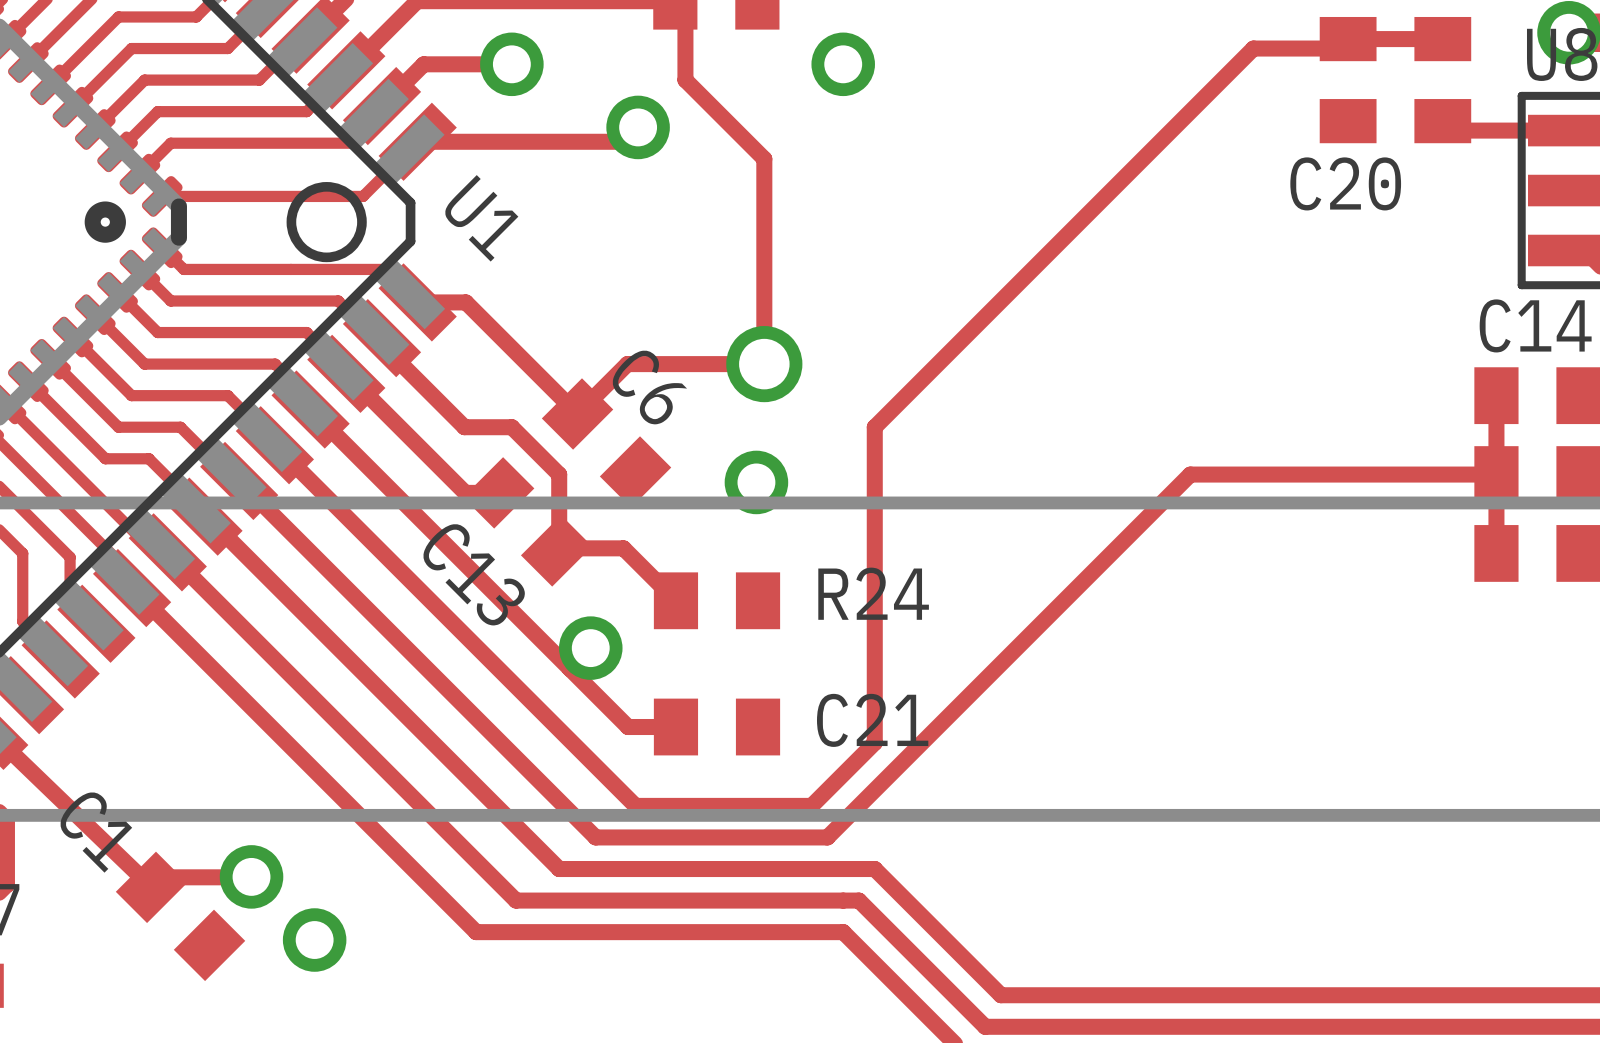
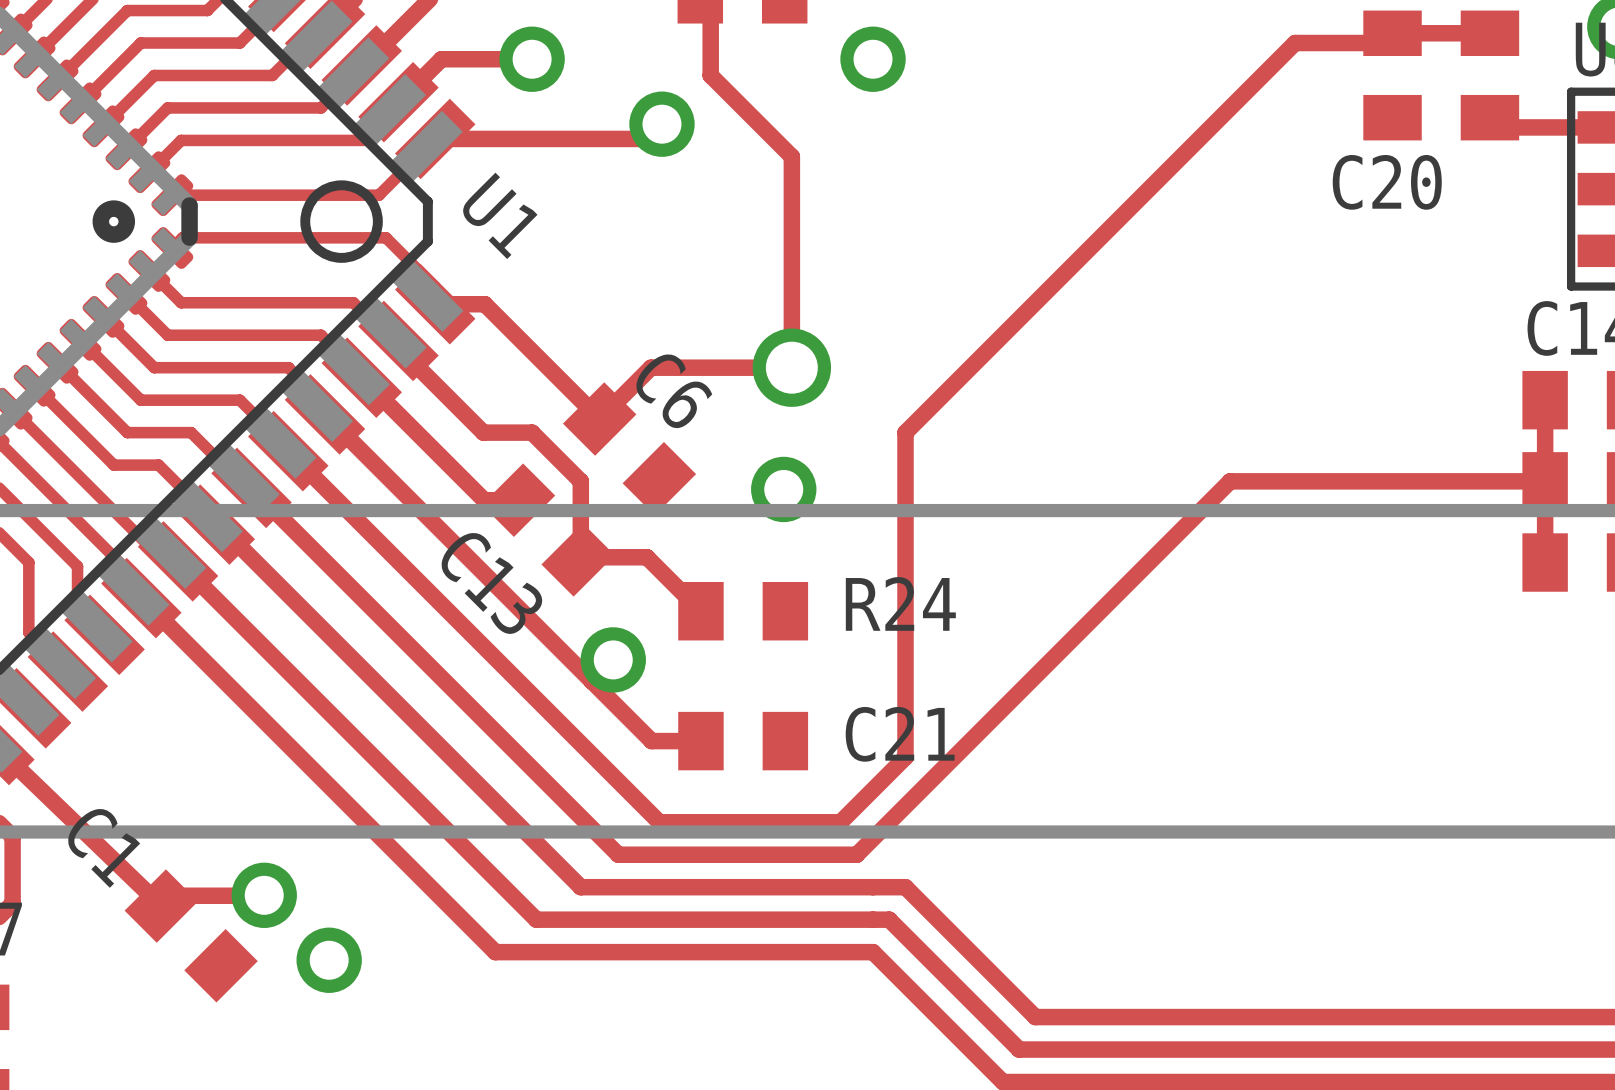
track: (162, 247) (183, 269) (384, 269) (417, 302) -> (172, 247) (182, 237) (385, 237) (435, 287) (435, 304)

